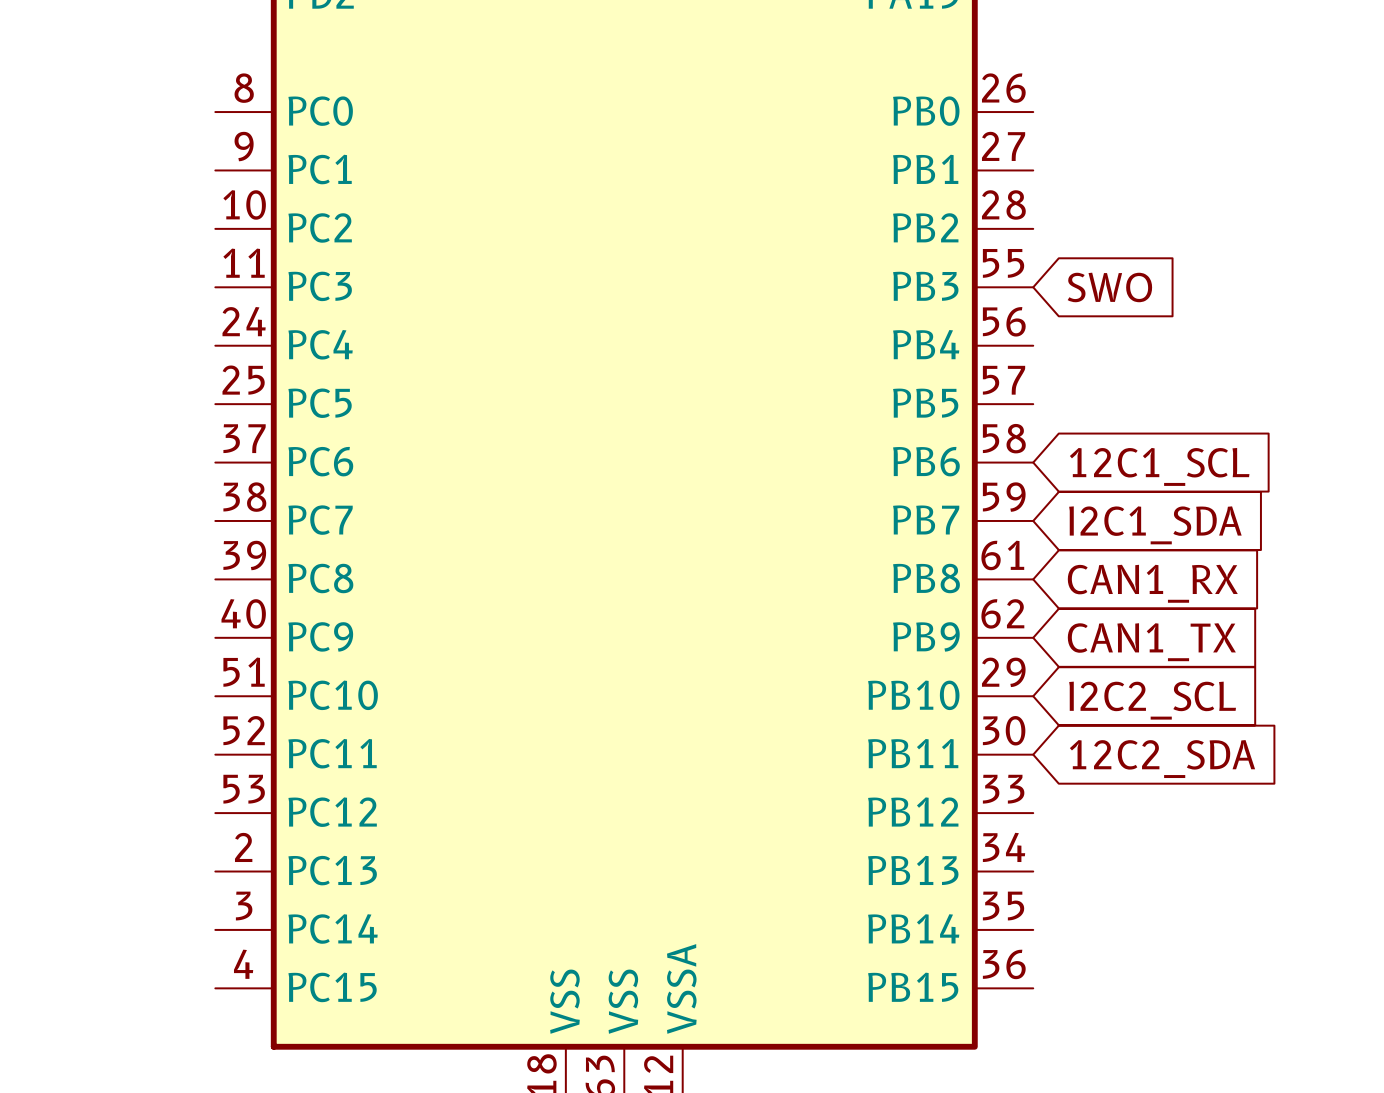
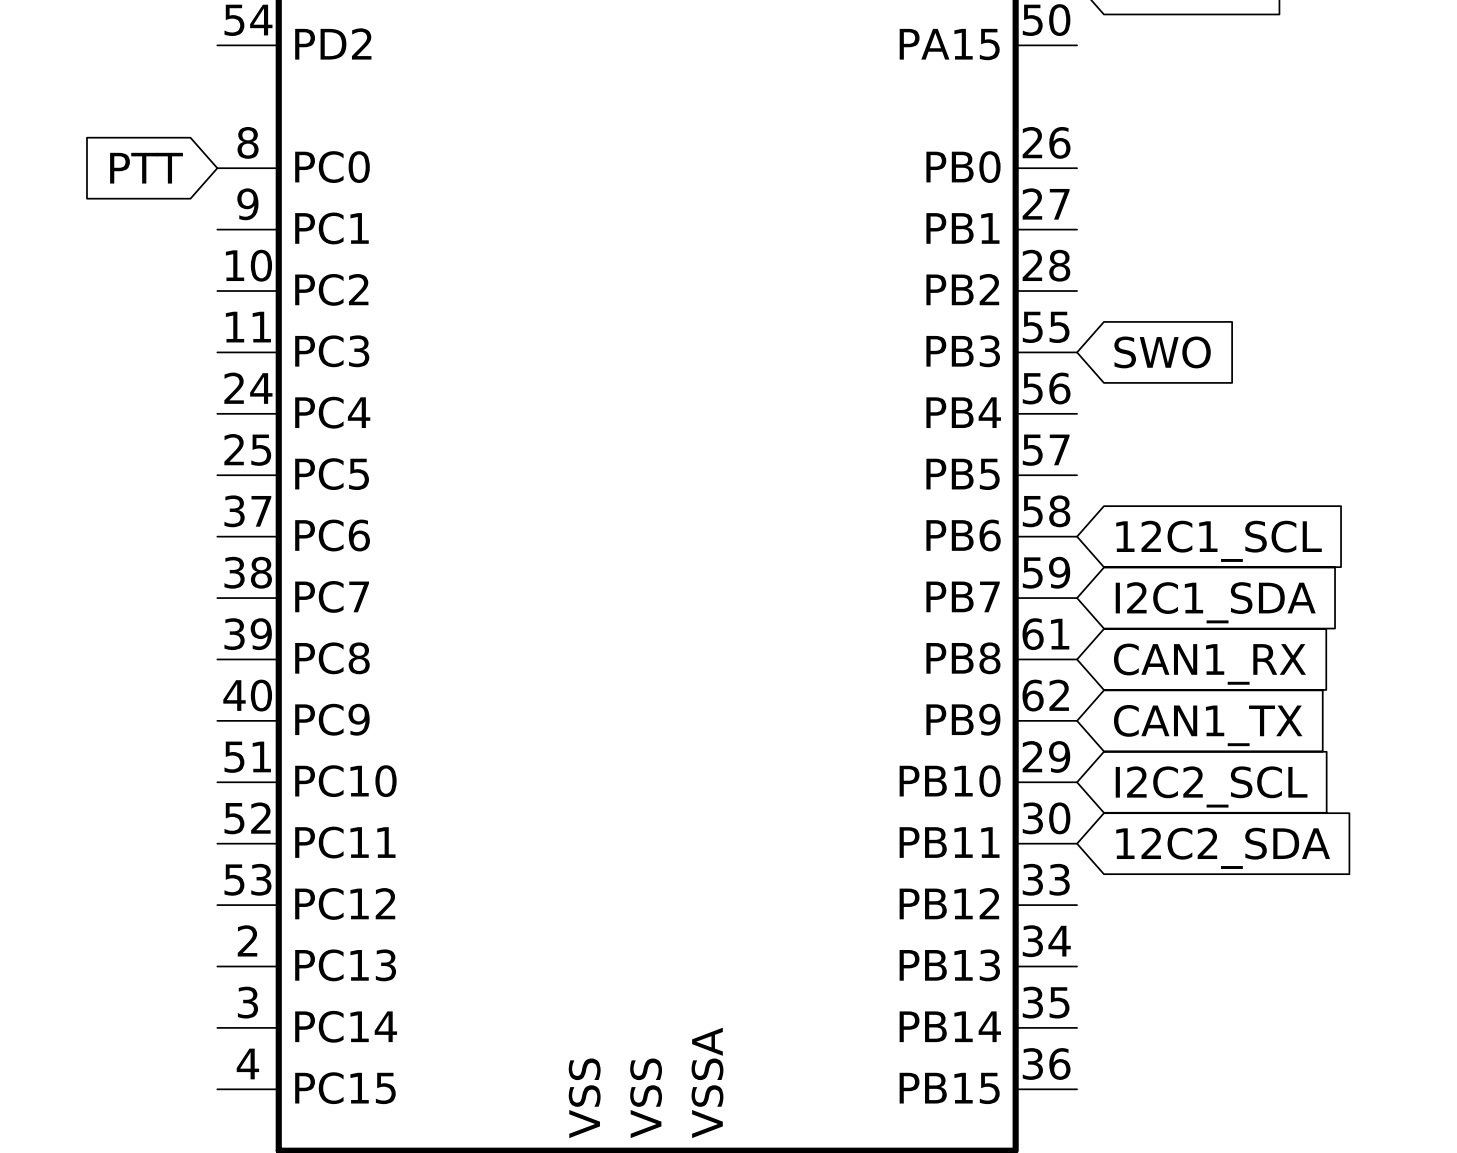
global label: none -> PTT (146, 168)

